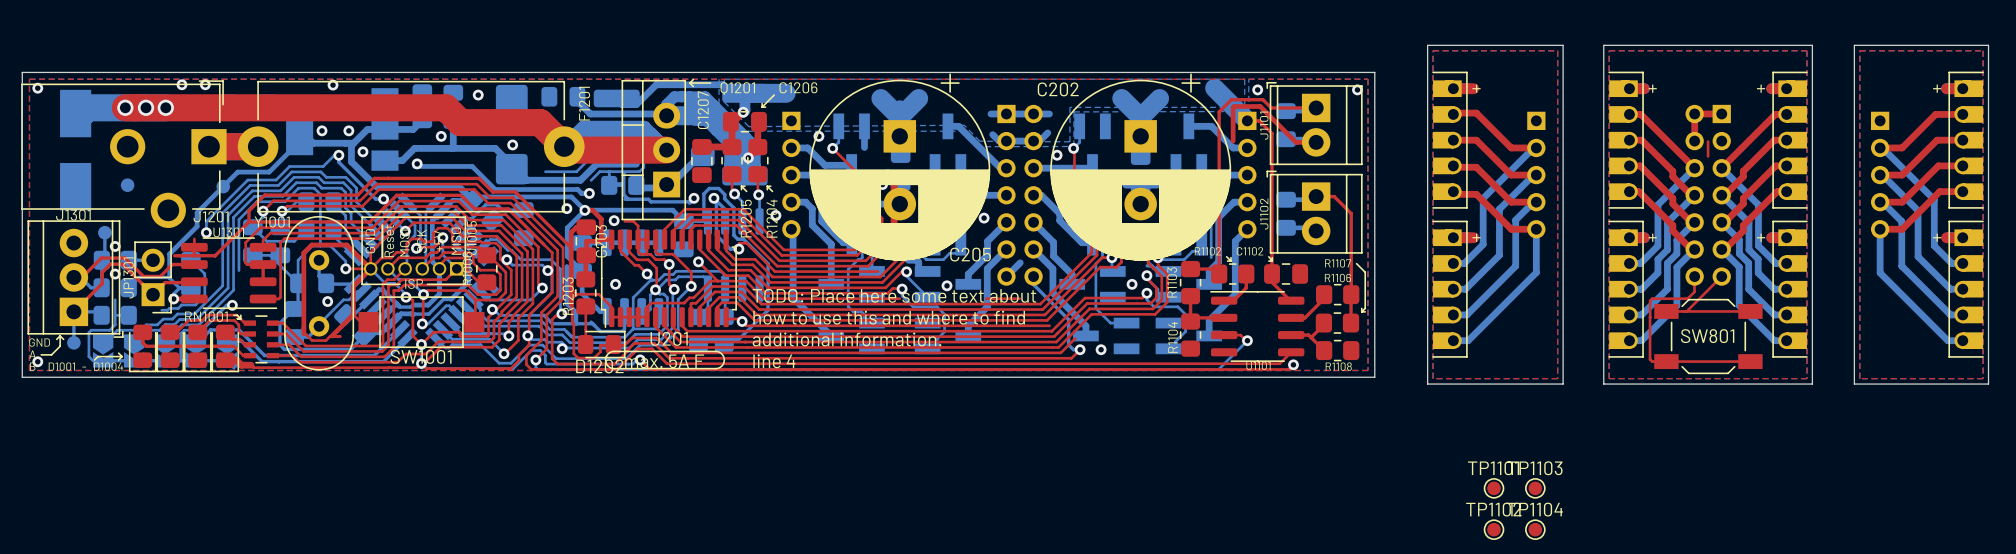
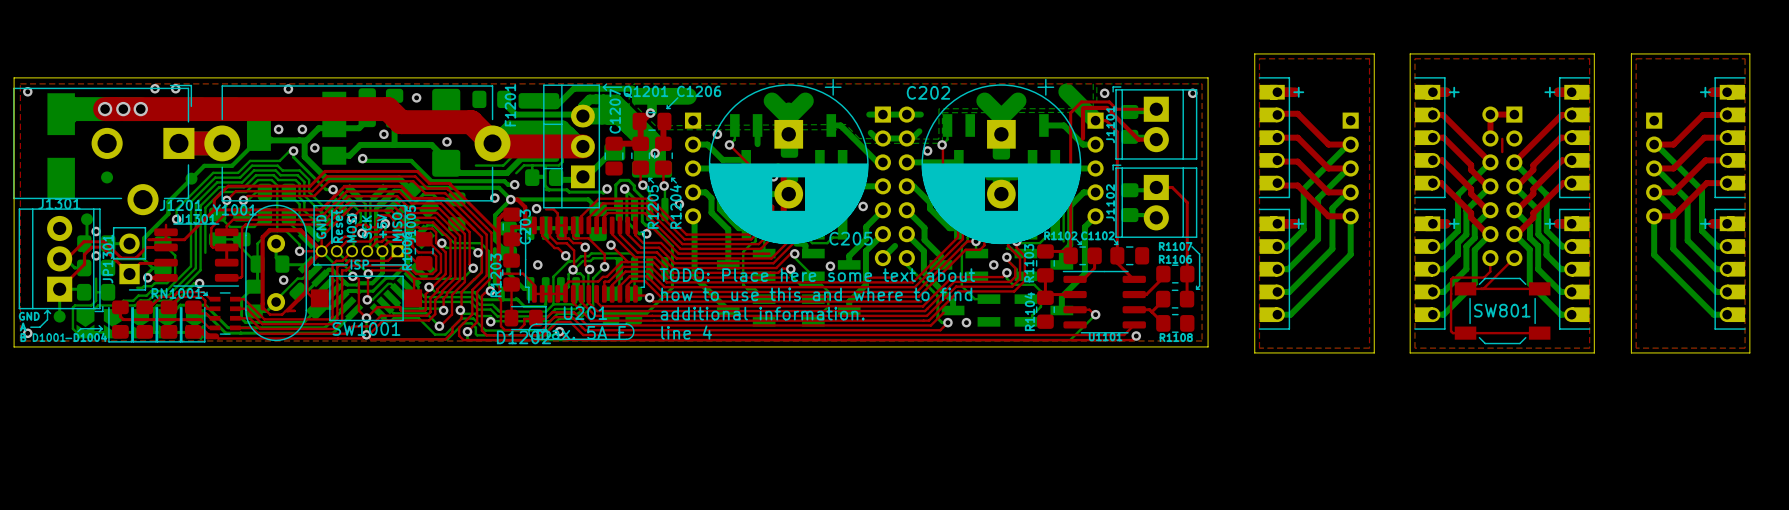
TP1101: (1494, 488) -> none
TP1103: (1535, 488) -> none
TP1102: (1494, 529) -> none
TP1104: (1535, 529) -> none

